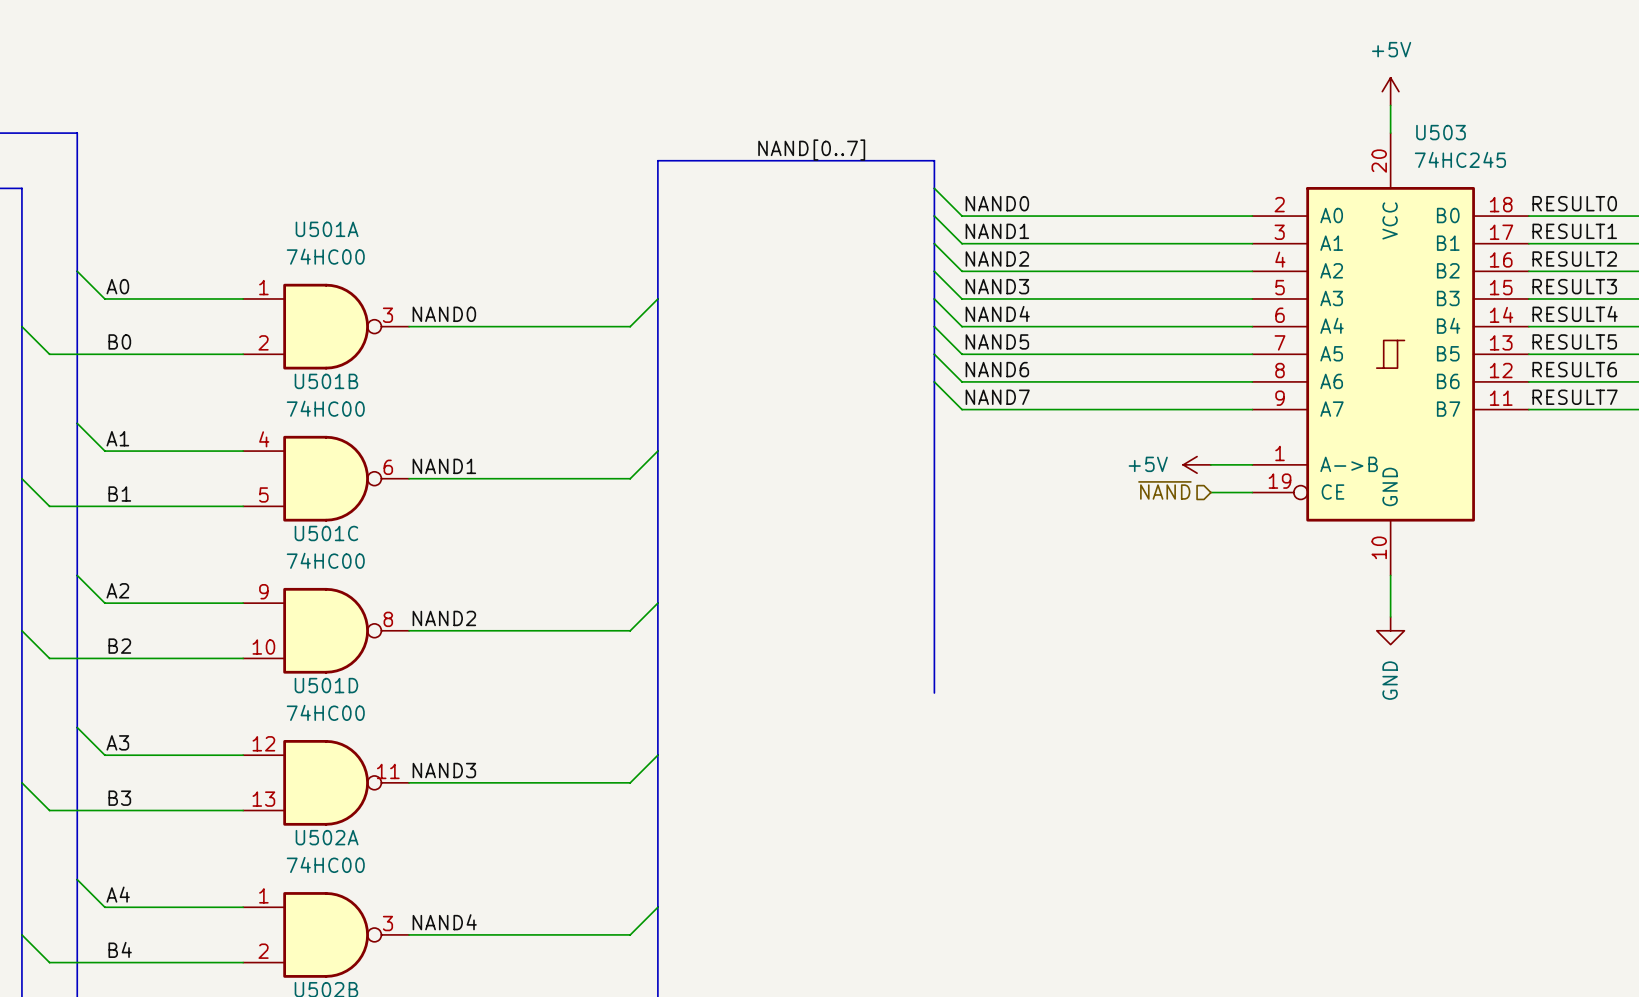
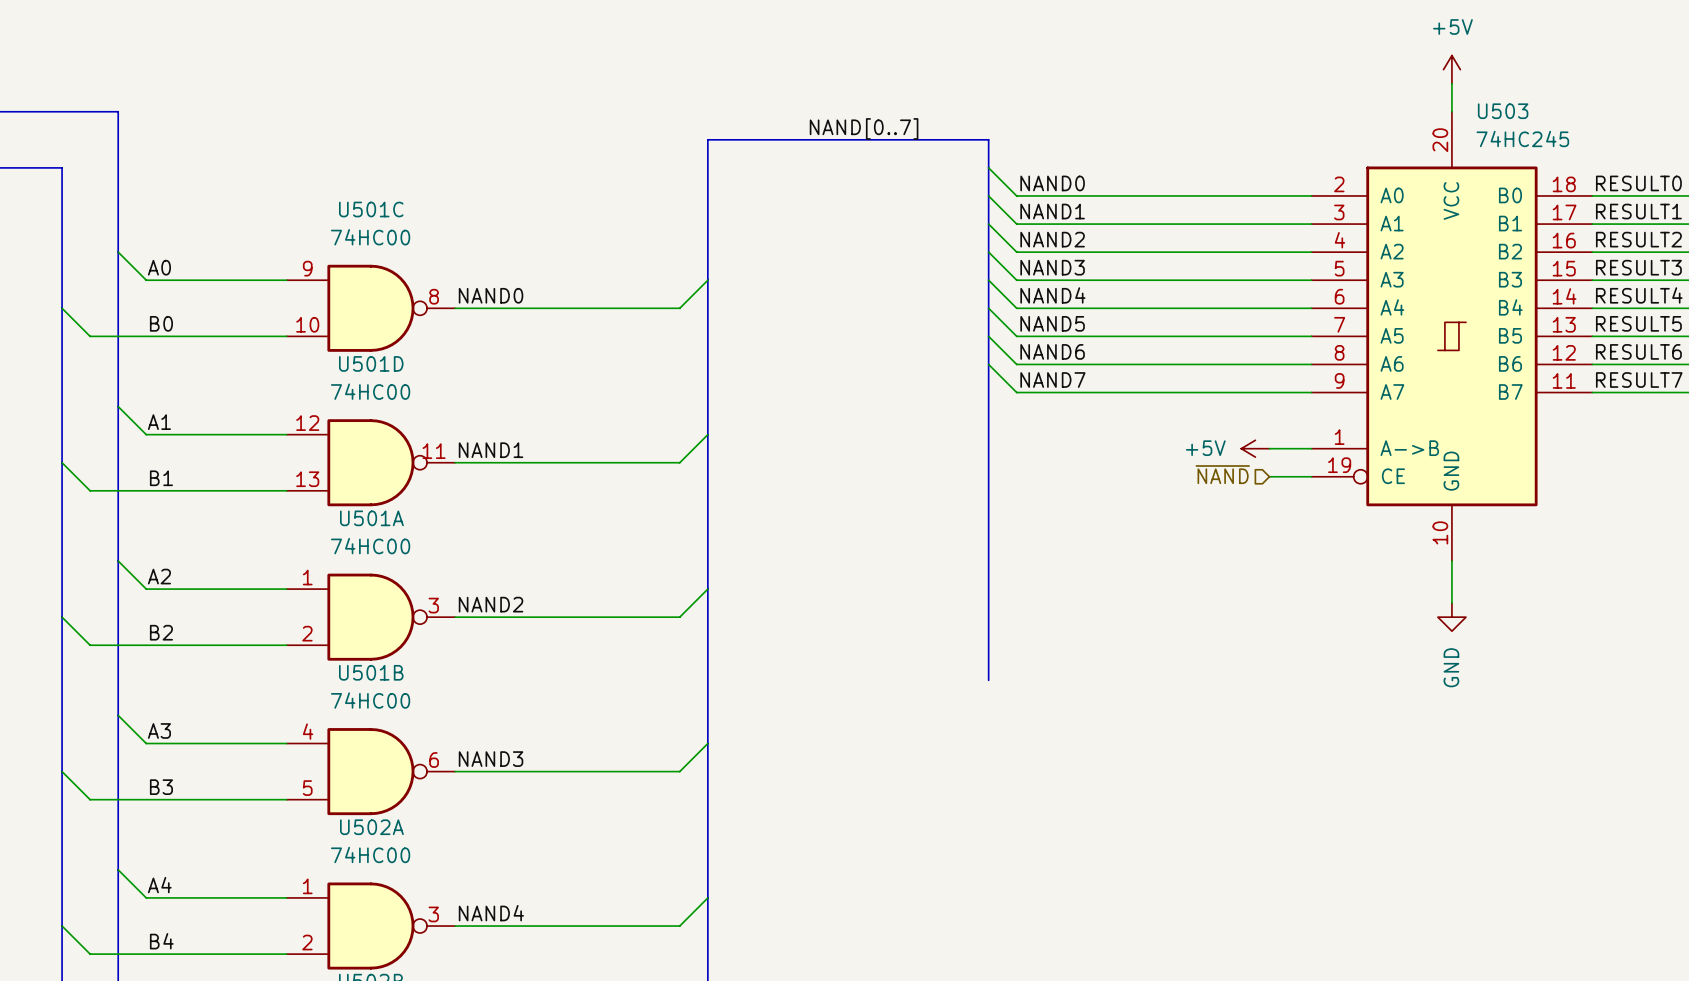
U501A position: (326, 326) -> (370, 617)
U501B position: (326, 478) -> (370, 771)
U501C position: (326, 630) -> (370, 308)
U501D position: (326, 782) -> (370, 462)

